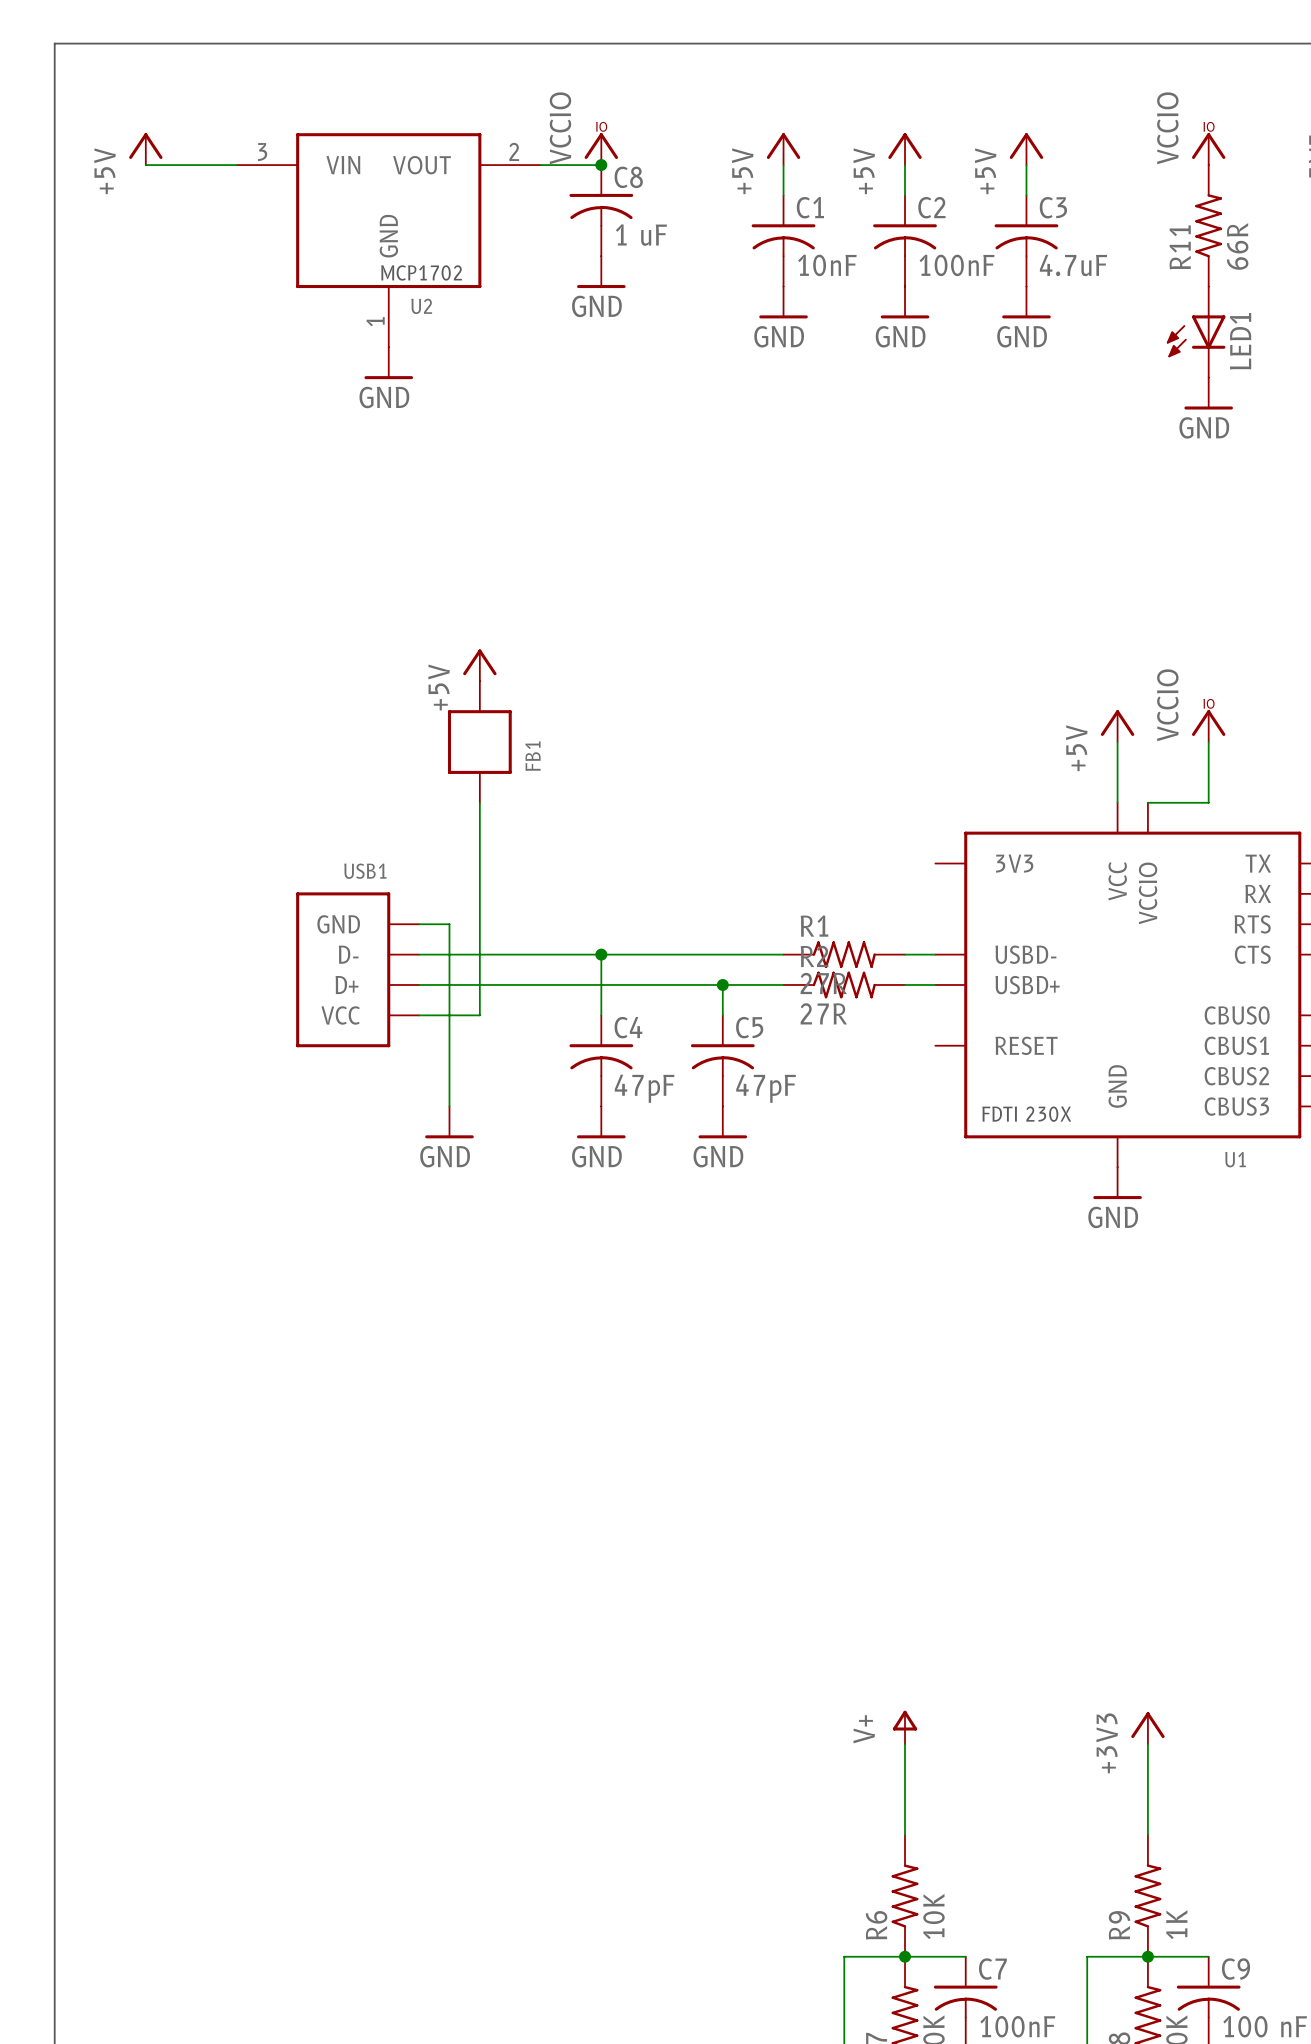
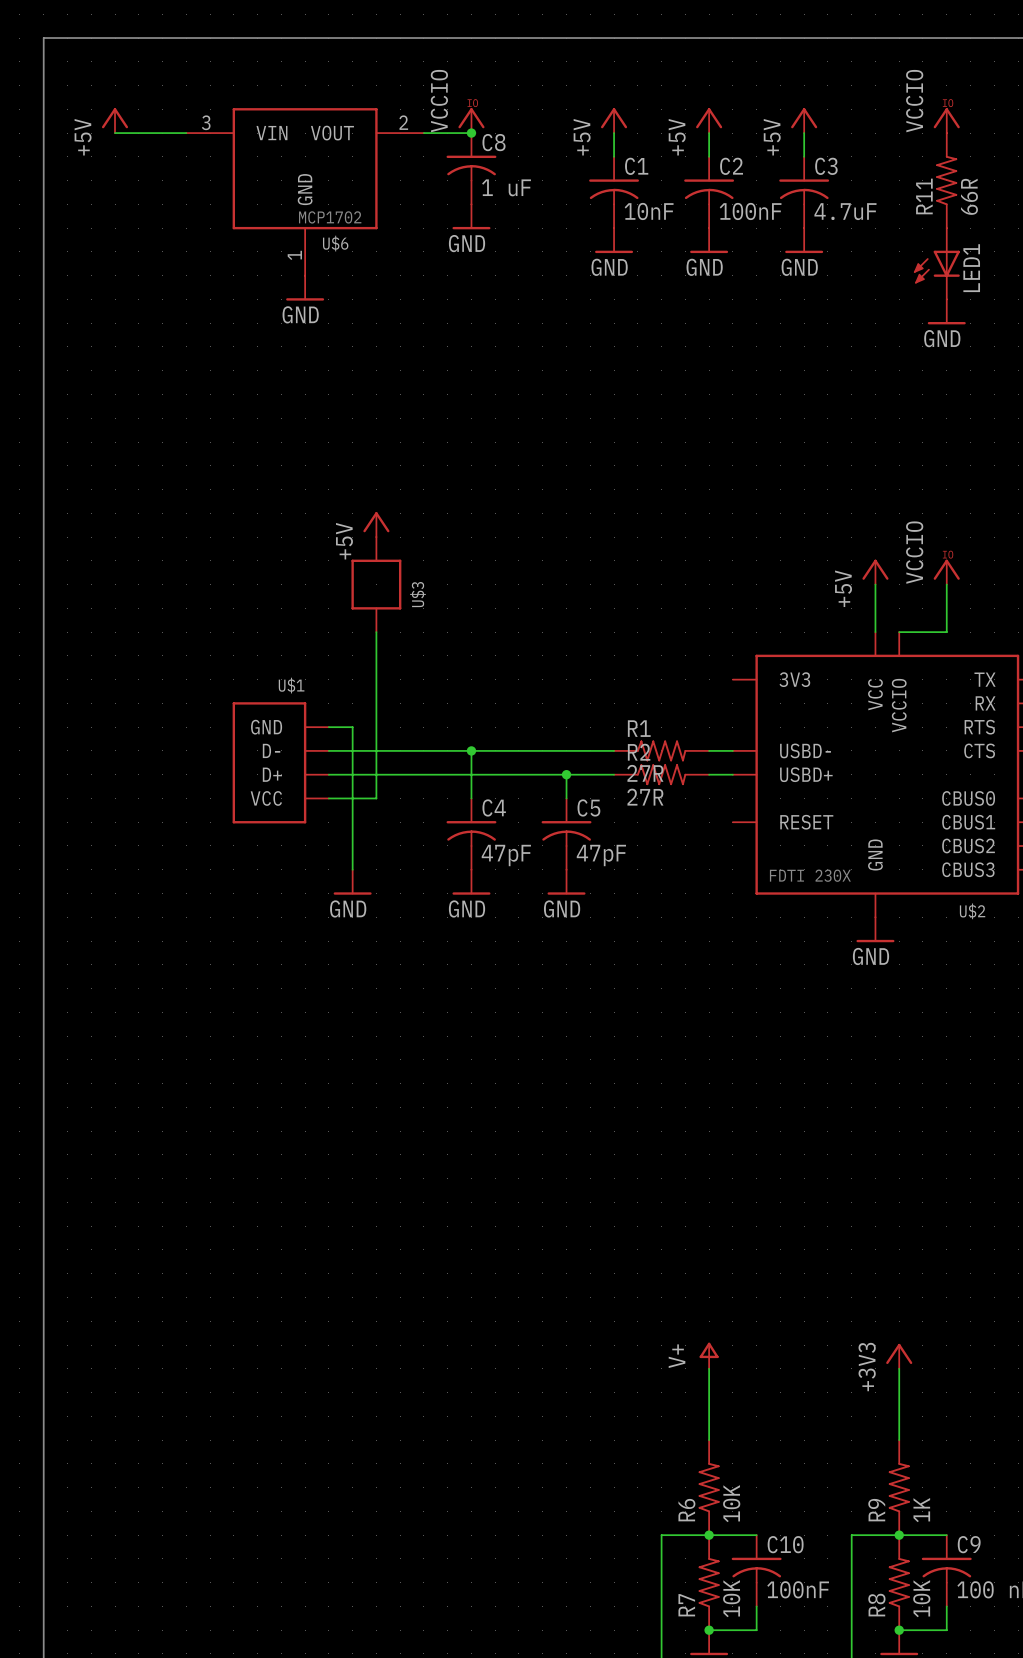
U2 name: U2 (421, 306) -> U$6 (335, 243)
FB1 name: FB1 (533, 756) -> U$3 (418, 594)
USB1 name: USB1 (365, 871) -> U$1 (291, 685)
U1 name: U1 (1235, 1159) -> U$2 (972, 911)
C7 name: C7 (992, 1969) -> C10 (785, 1544)

